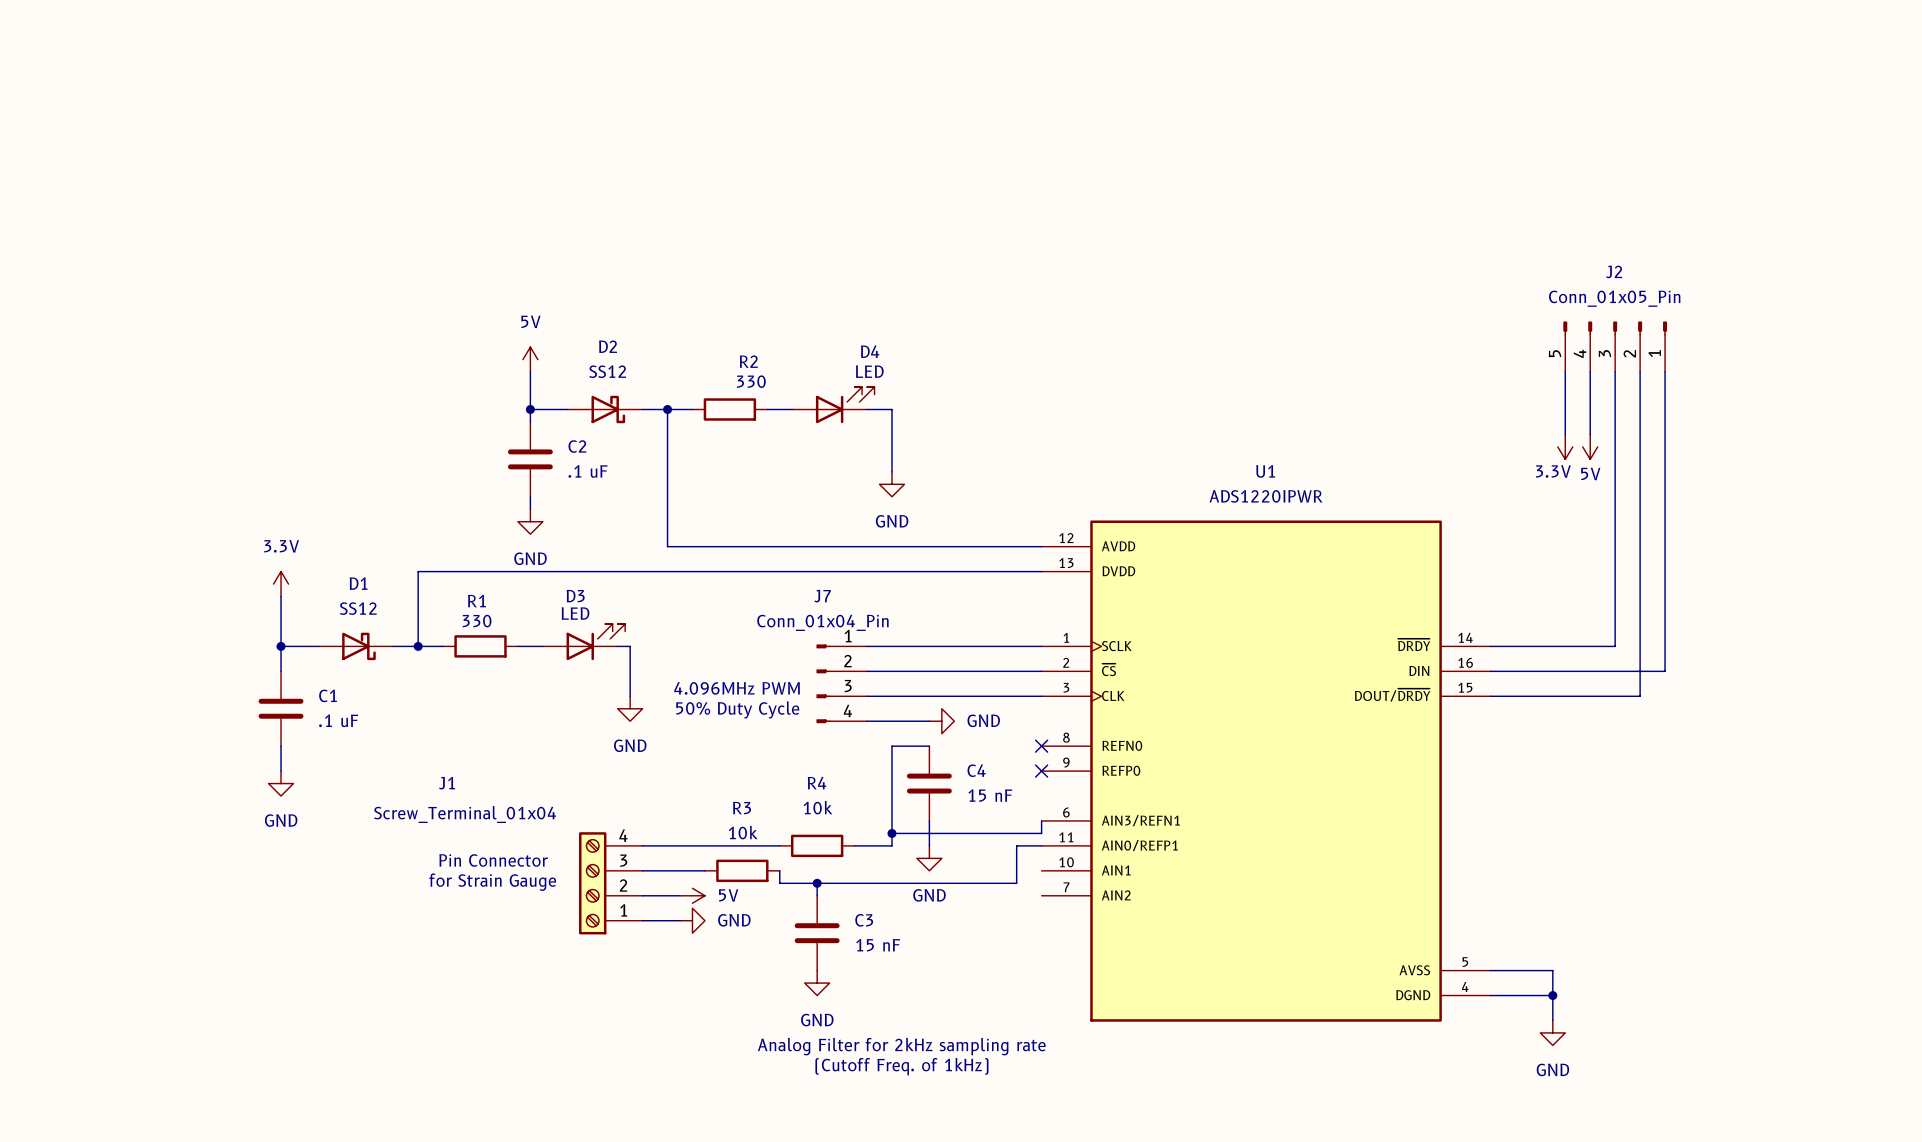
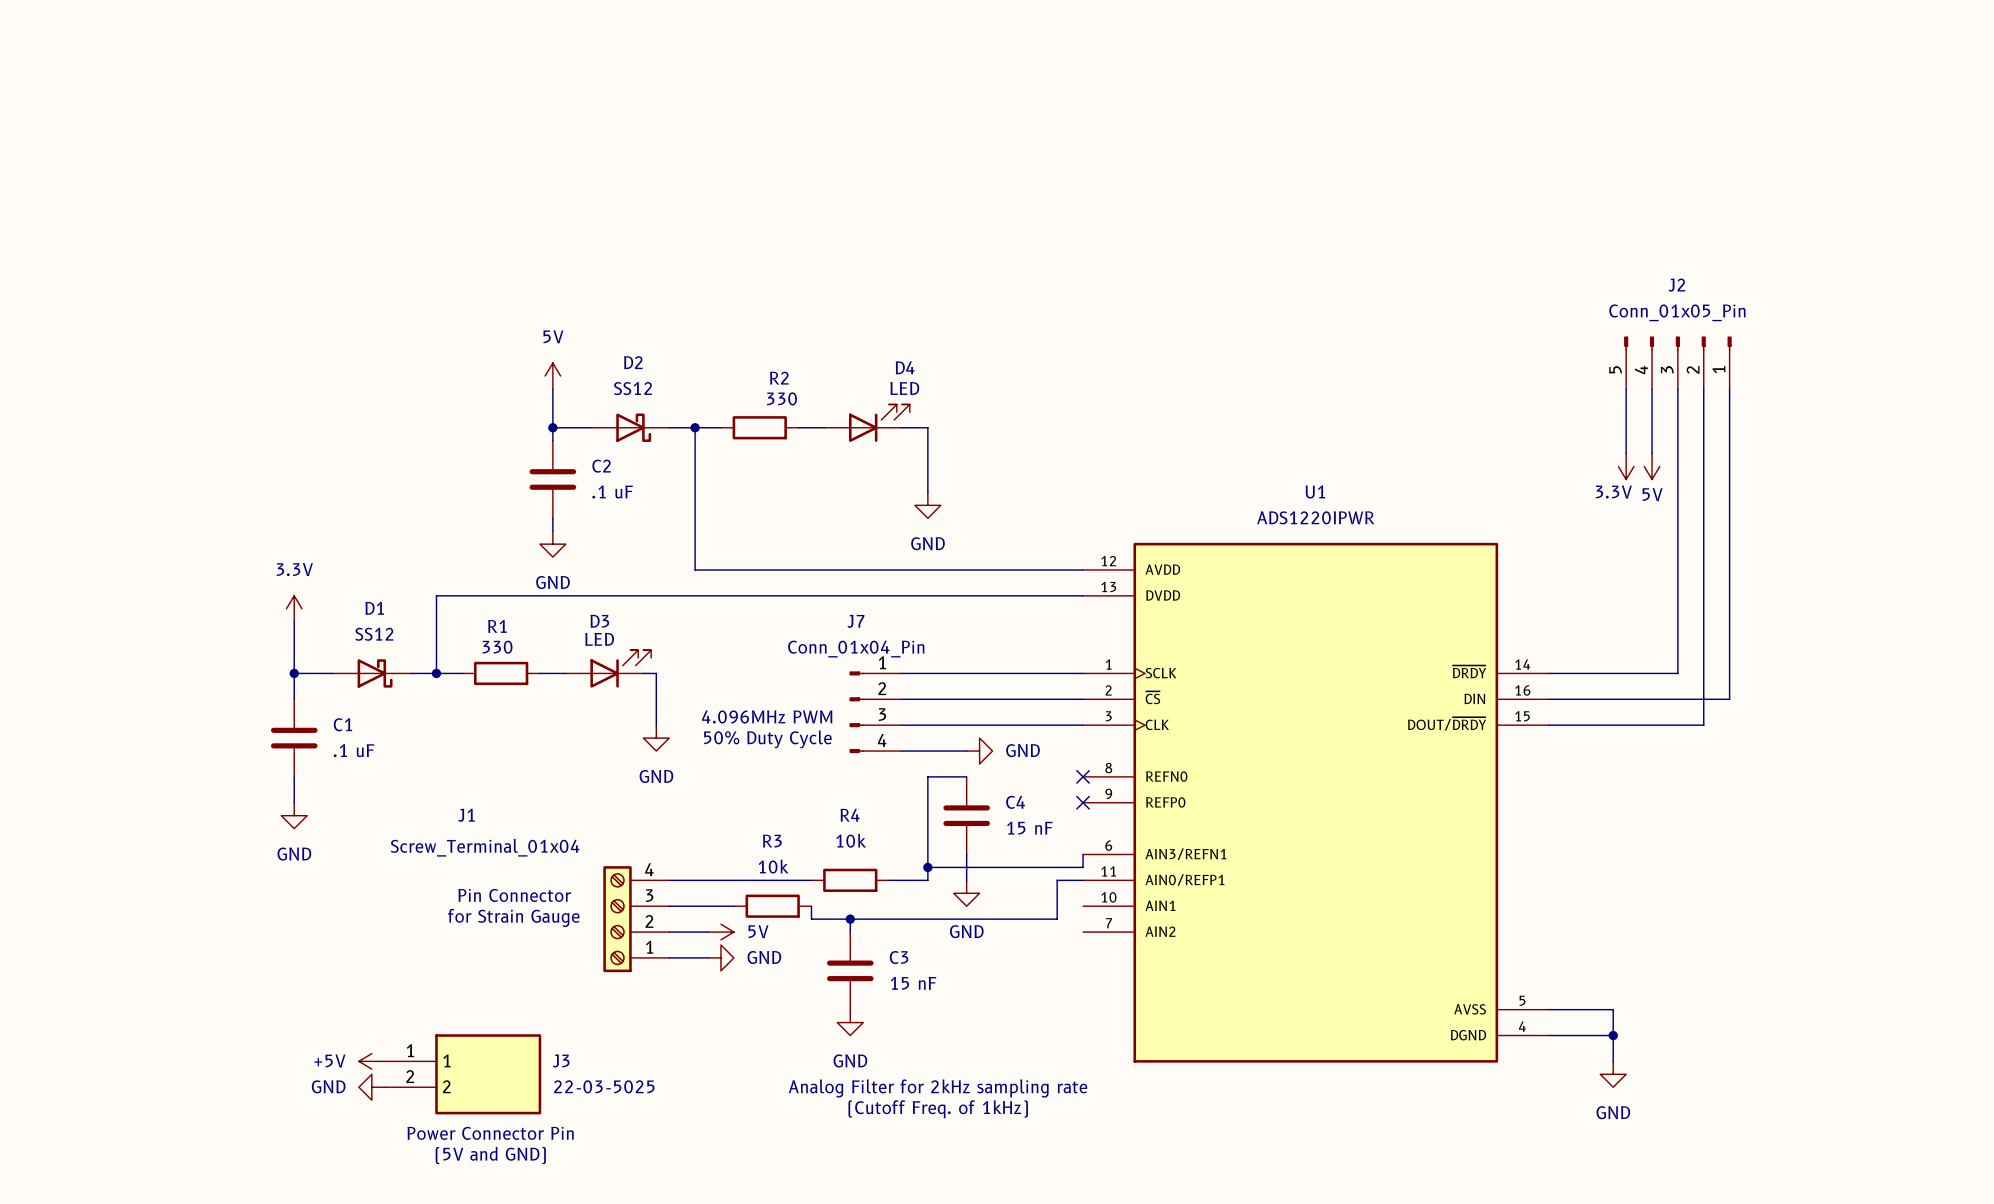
power symbol: none -> +5V (371, 1061)
J3: none -> 22-03-5025 (462, 1074)
power symbol: none -> GND (371, 1087)
text: none -> Power Connector Pin (490, 1133)
text: none -> (5V and GND) (490, 1155)

